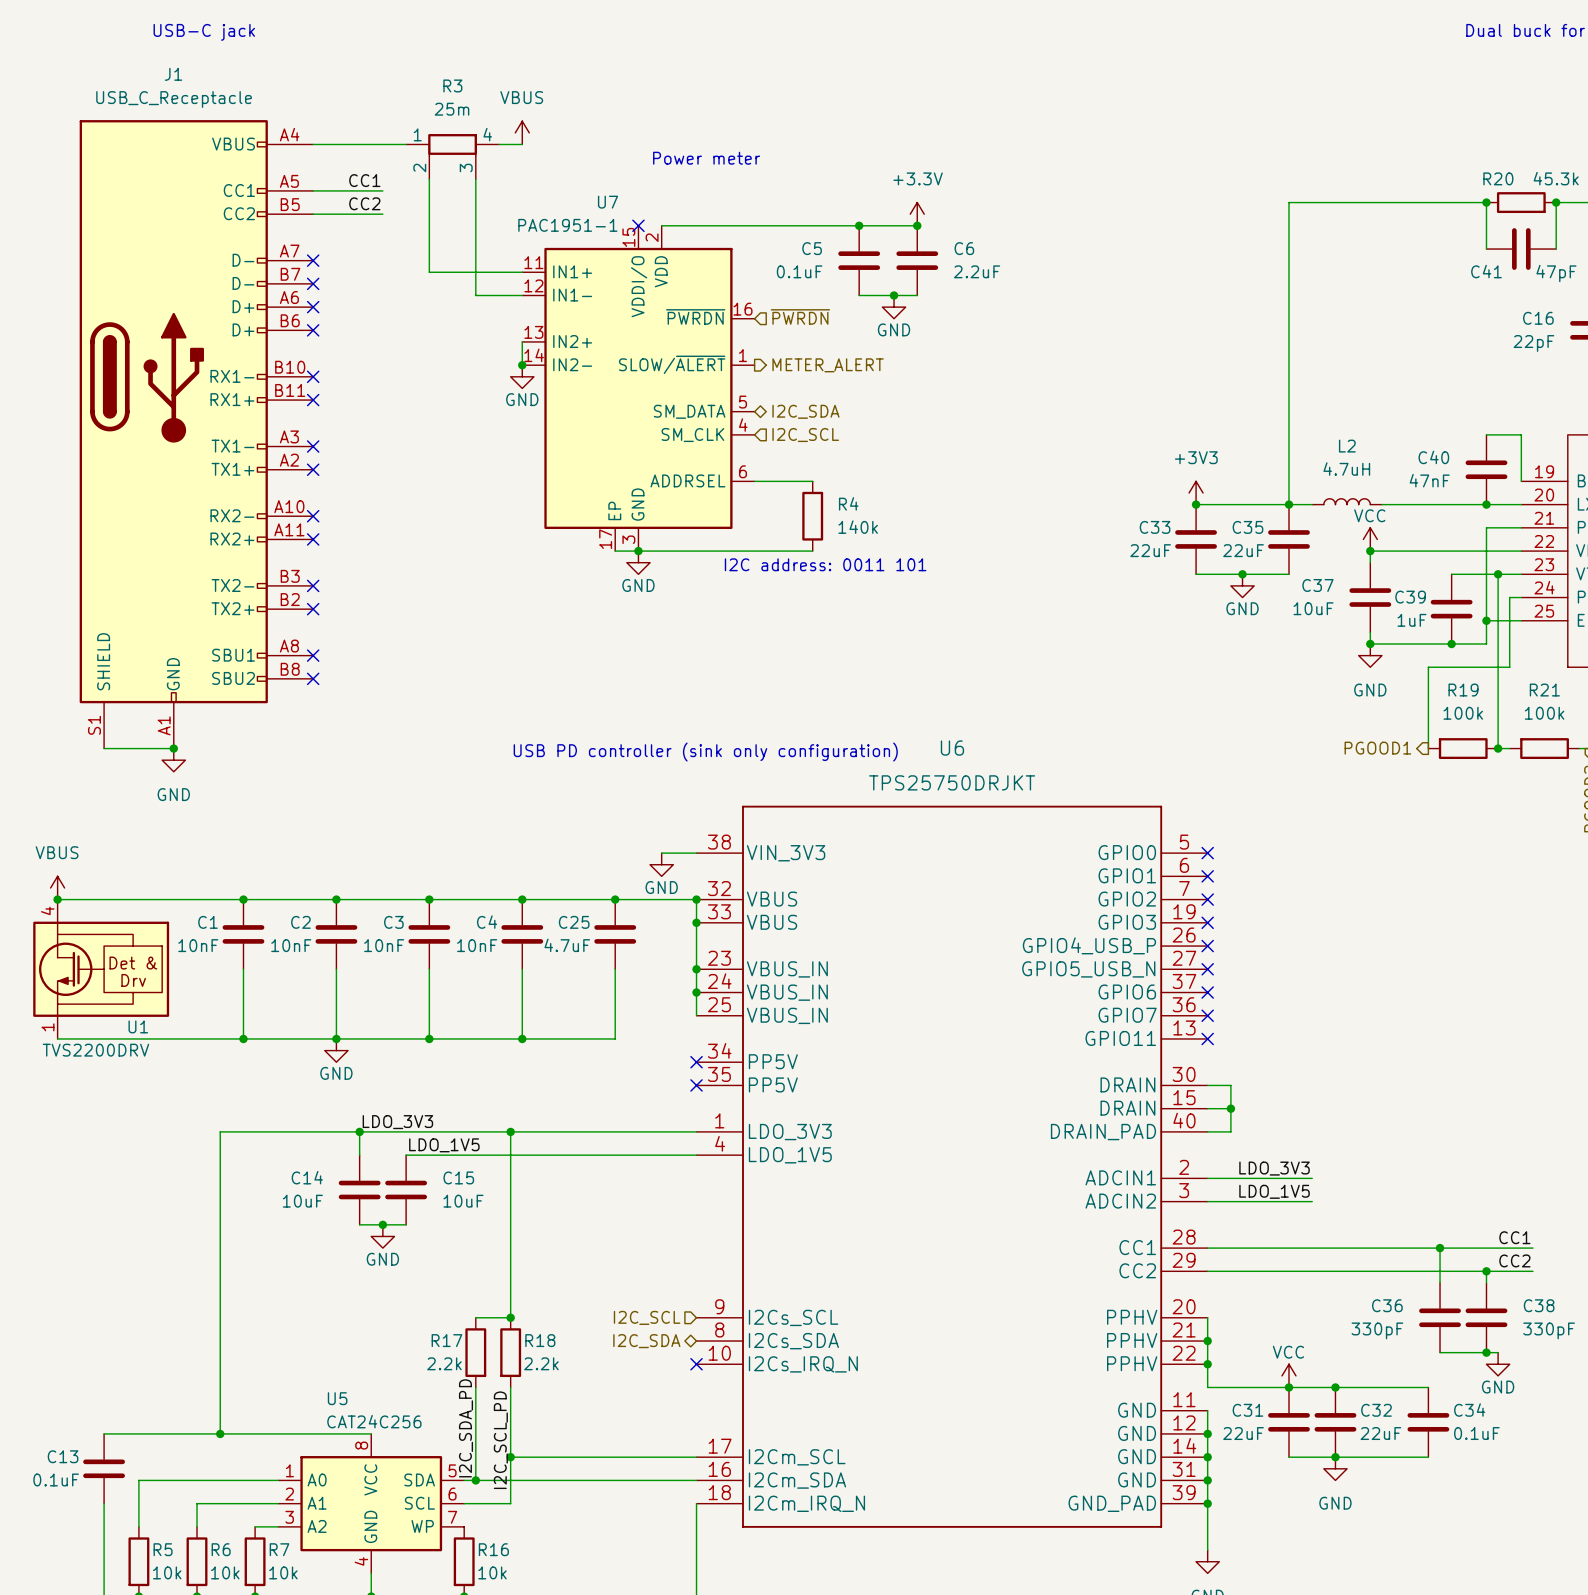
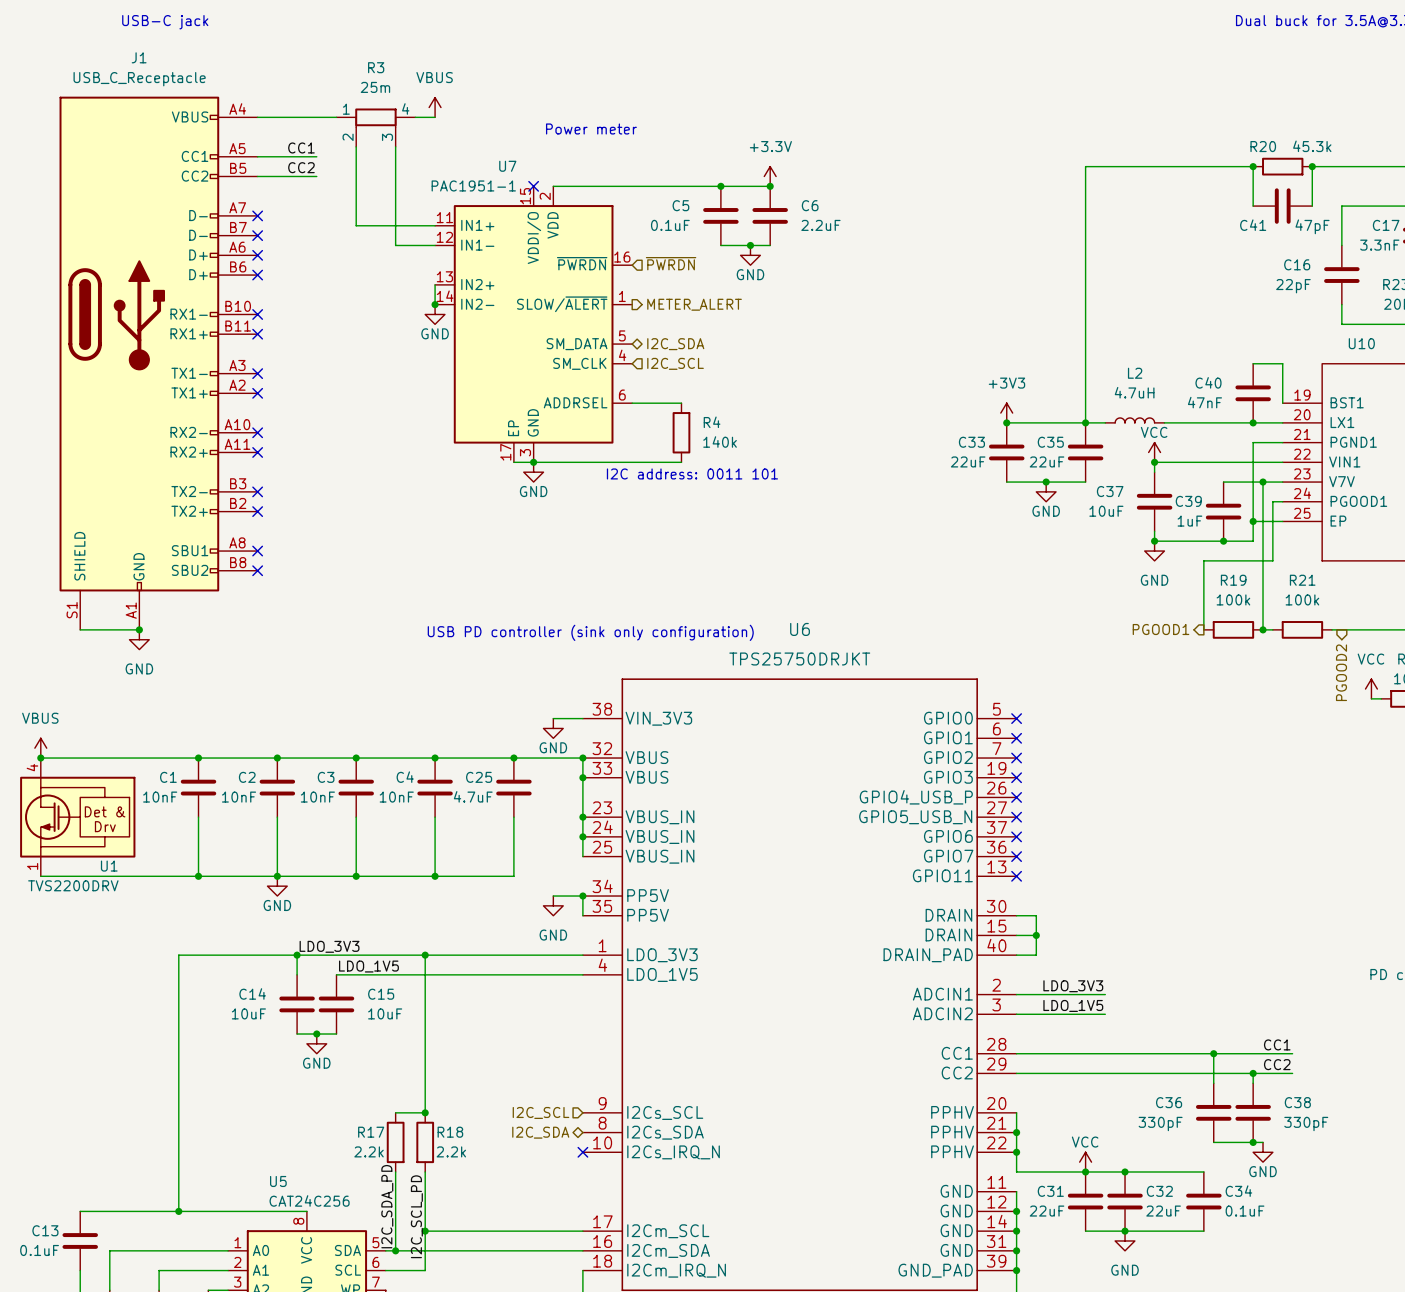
wire: none -> (553, 896) (582, 896) (582, 915)
no-connect mark: (696, 1062) -> none
junction: none -> (582, 896)
power symbol: none -> GND (553, 905)
no-connect mark: (696, 1085) -> none

